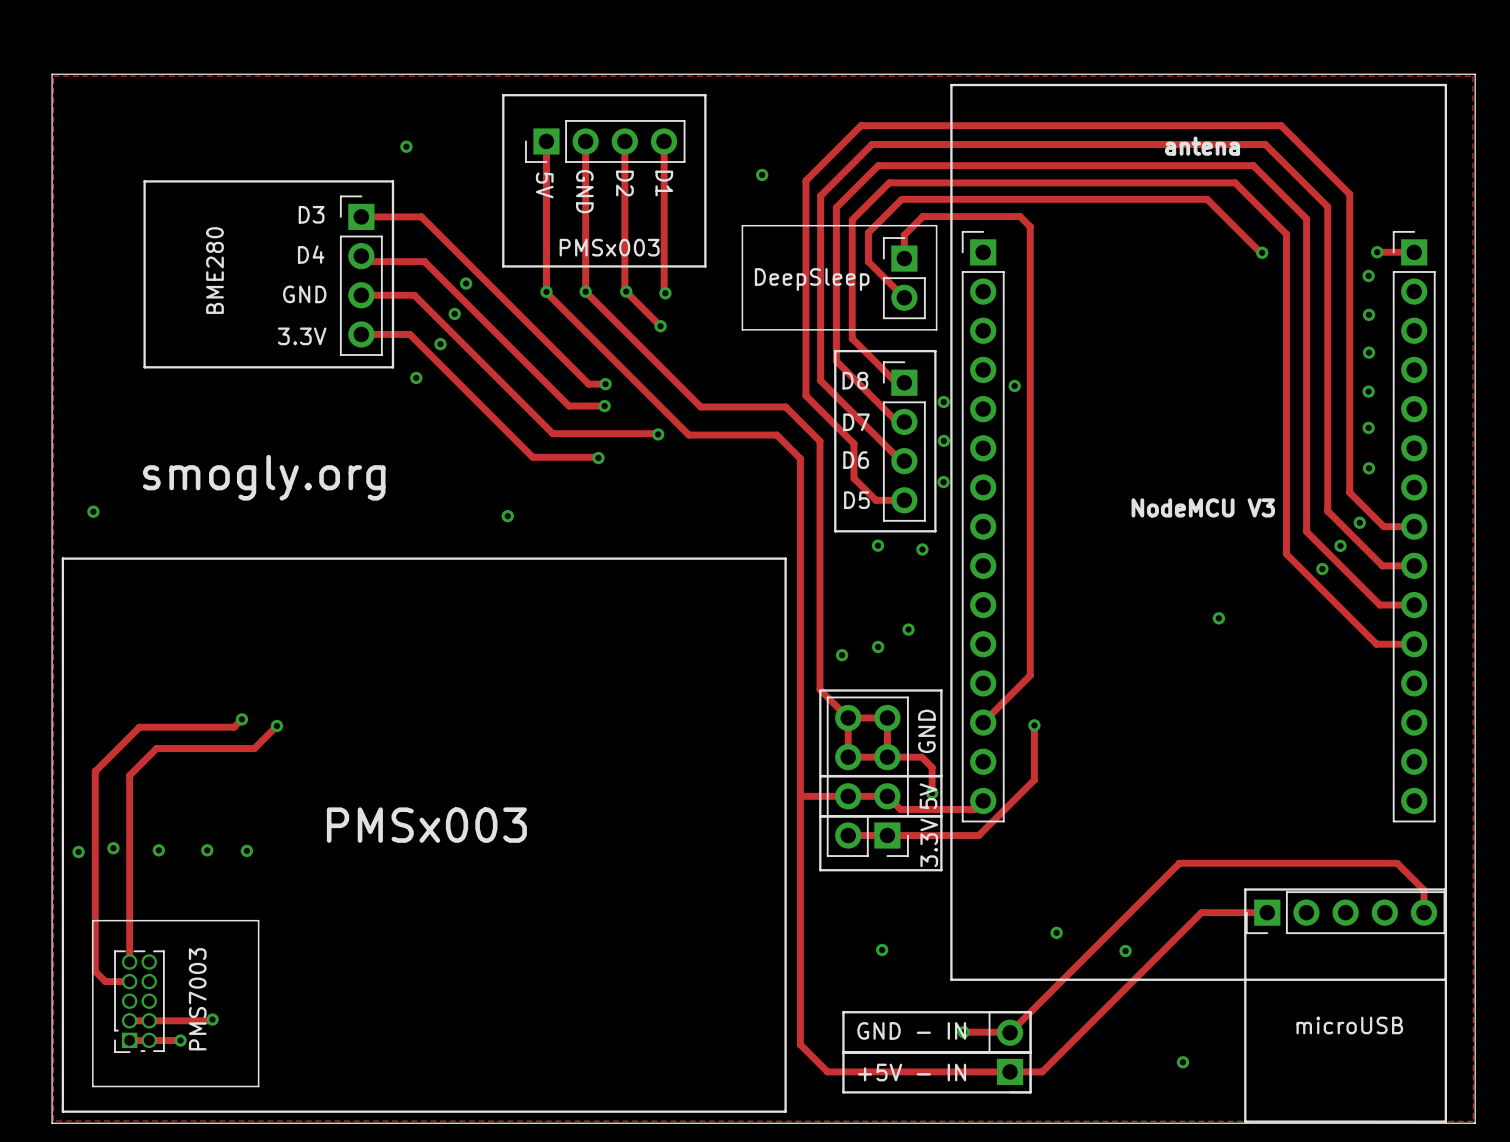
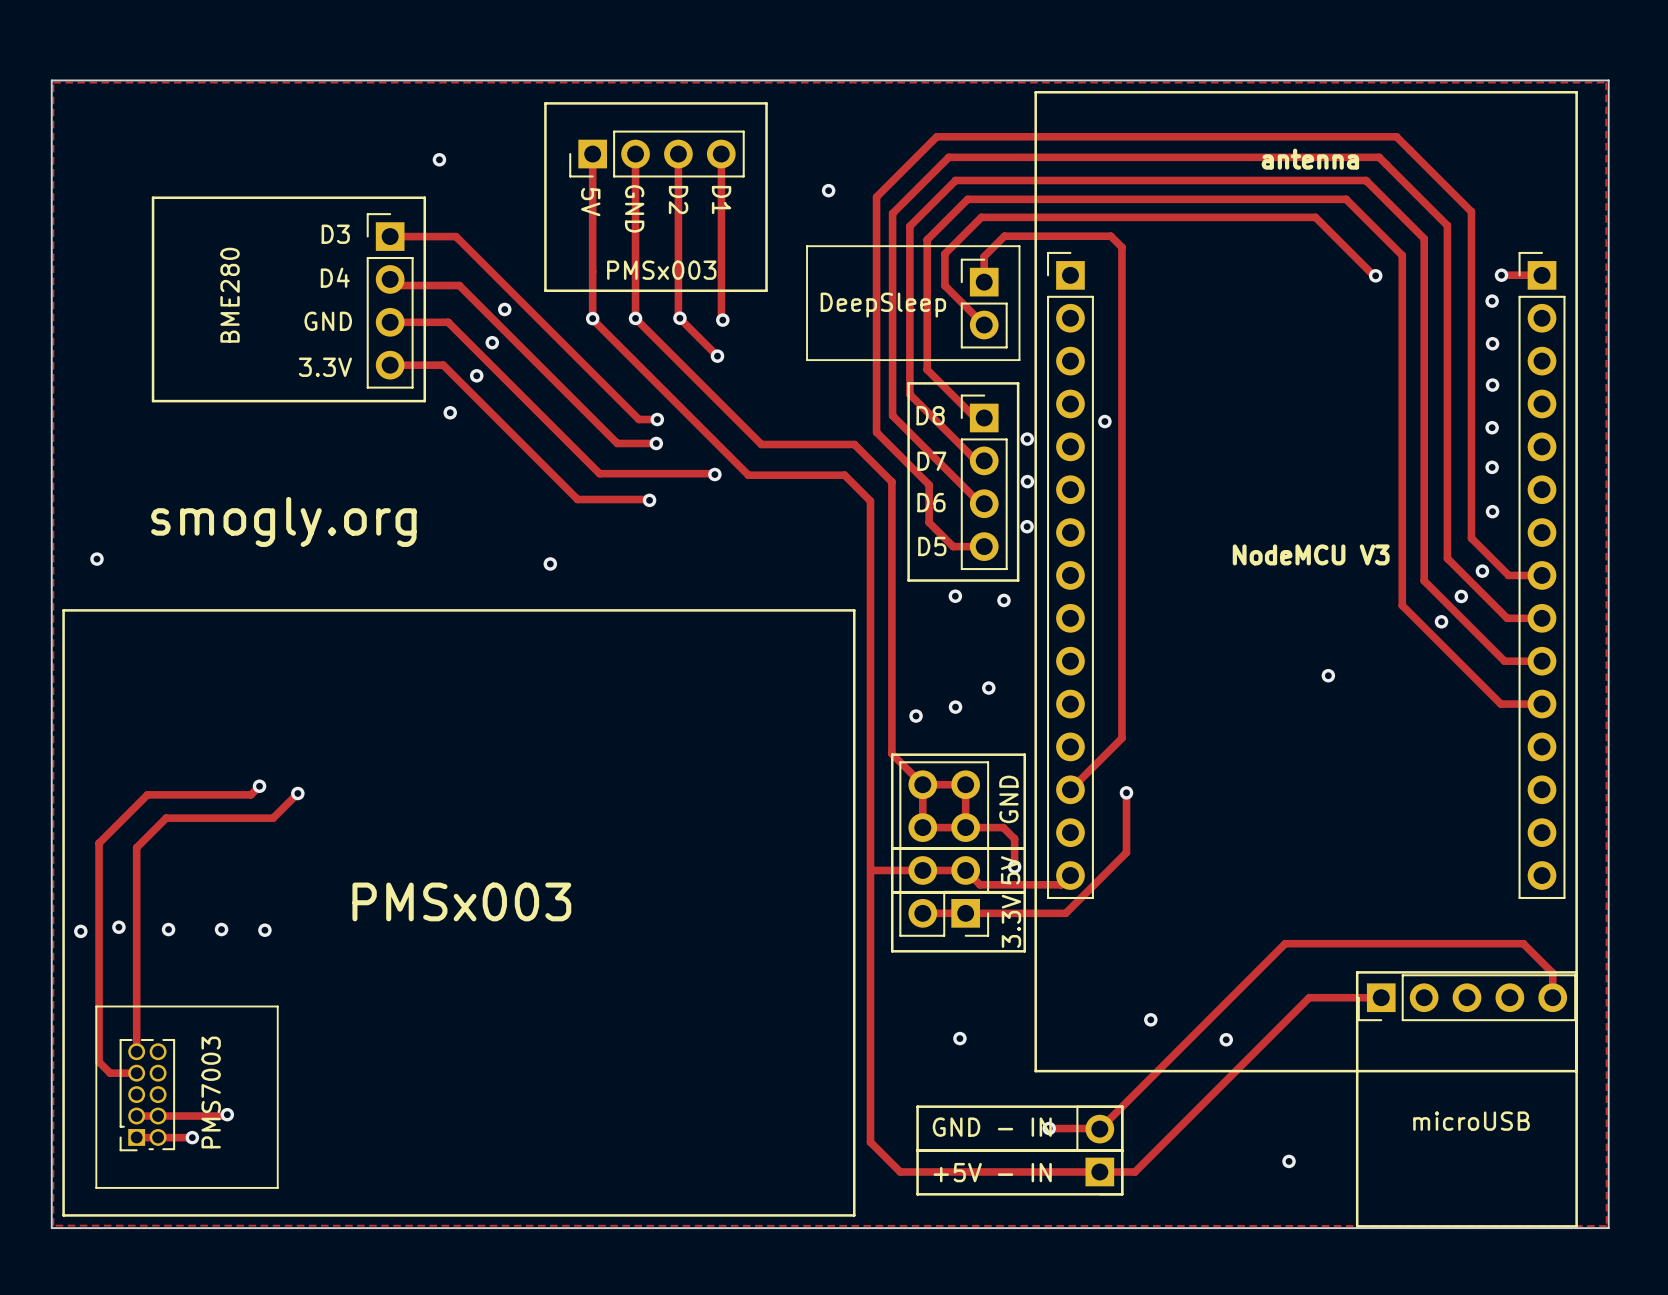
text: antena (1202, 146) -> antenna (1310, 159)

